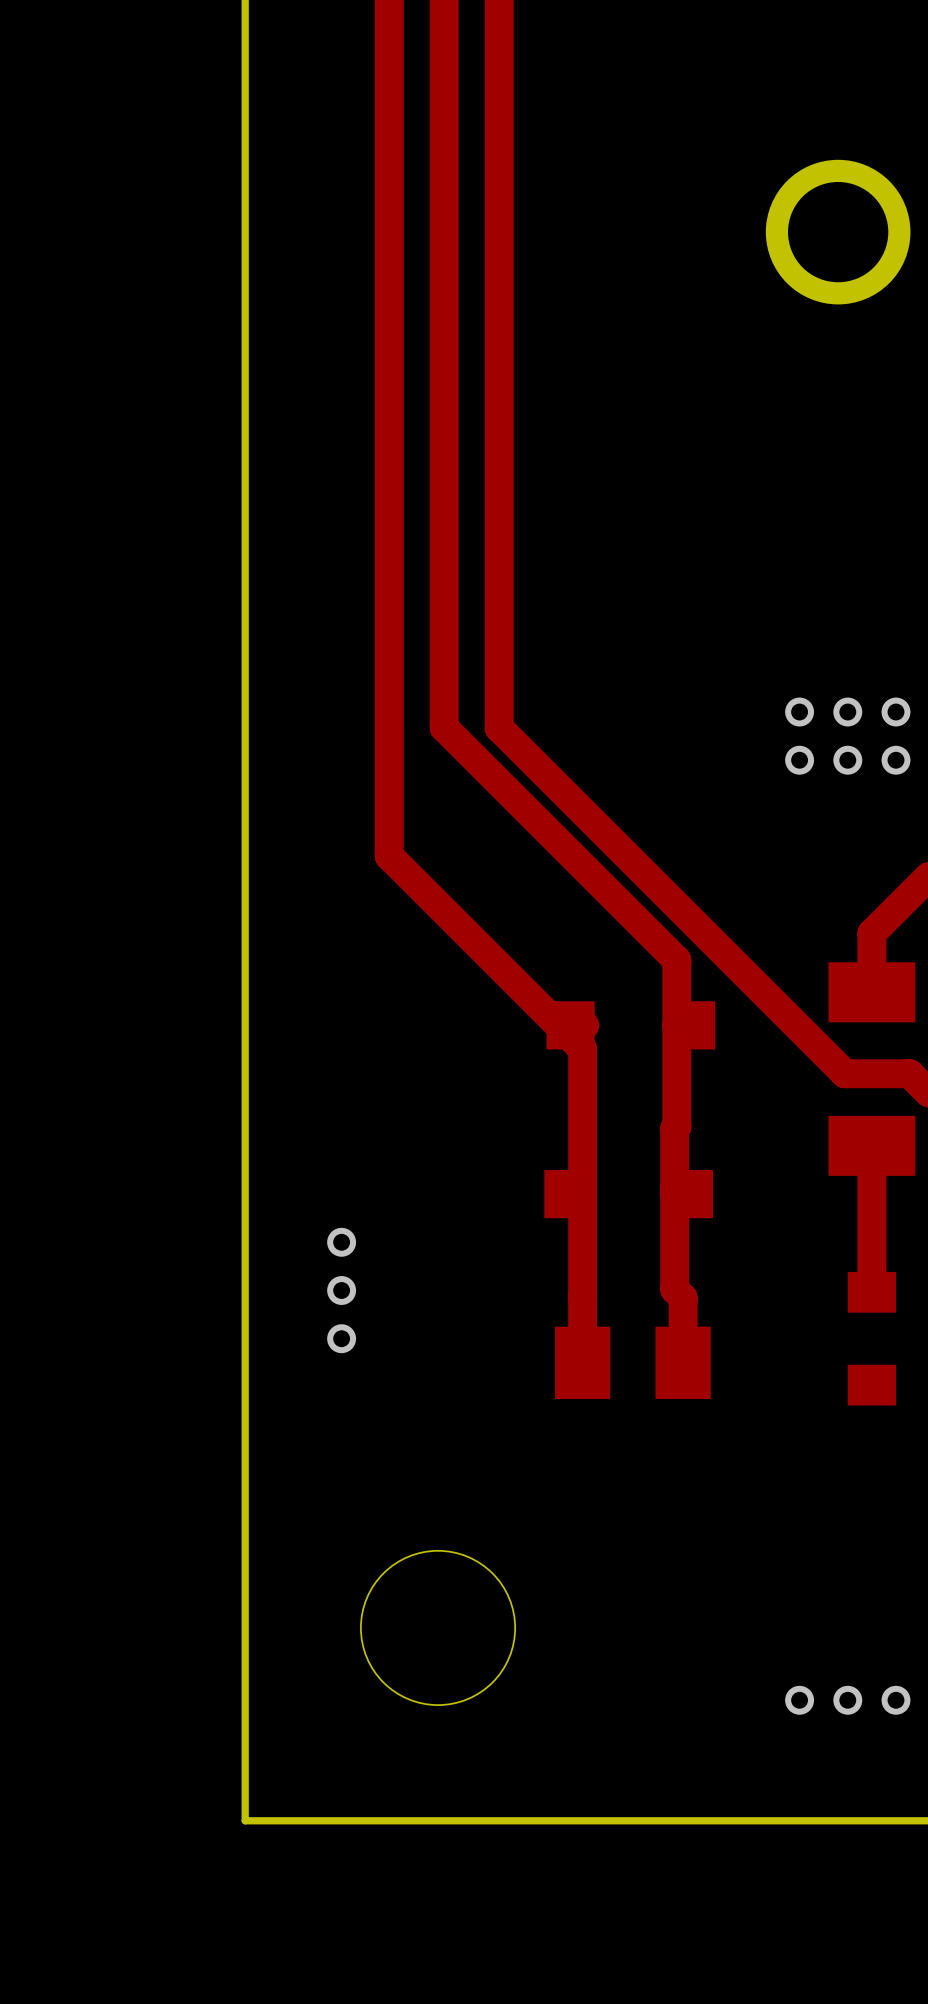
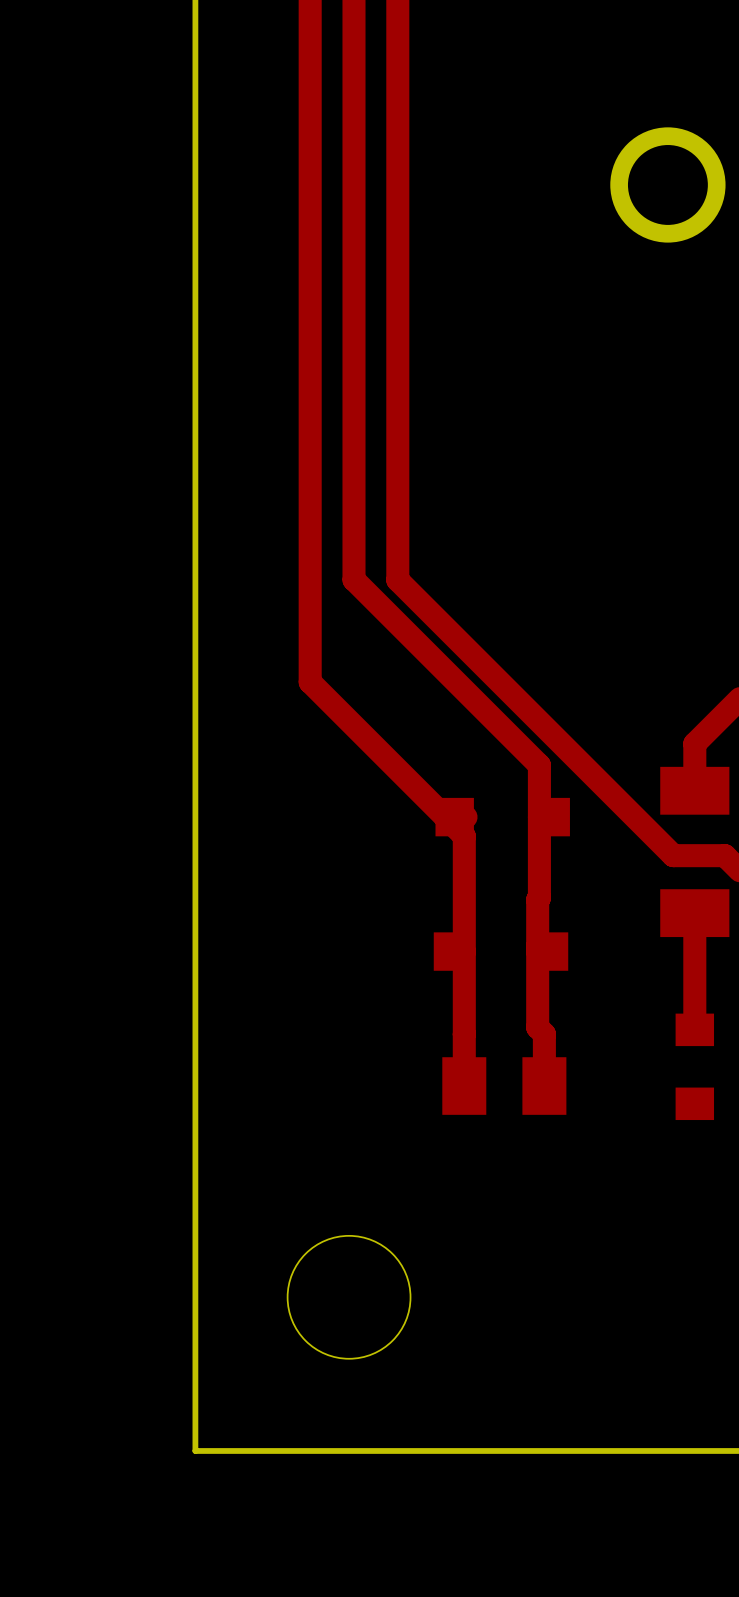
via: (799, 712) -> none
via: (847, 712) -> none
via: (895, 712) -> none
via: (799, 760) -> none
via: (847, 760) -> none
via: (895, 760) -> none
via: (341, 1242) -> none
via: (341, 1290) -> none
via: (341, 1338) -> none
via: (799, 1700) -> none
via: (847, 1700) -> none
via: (895, 1700) -> none

